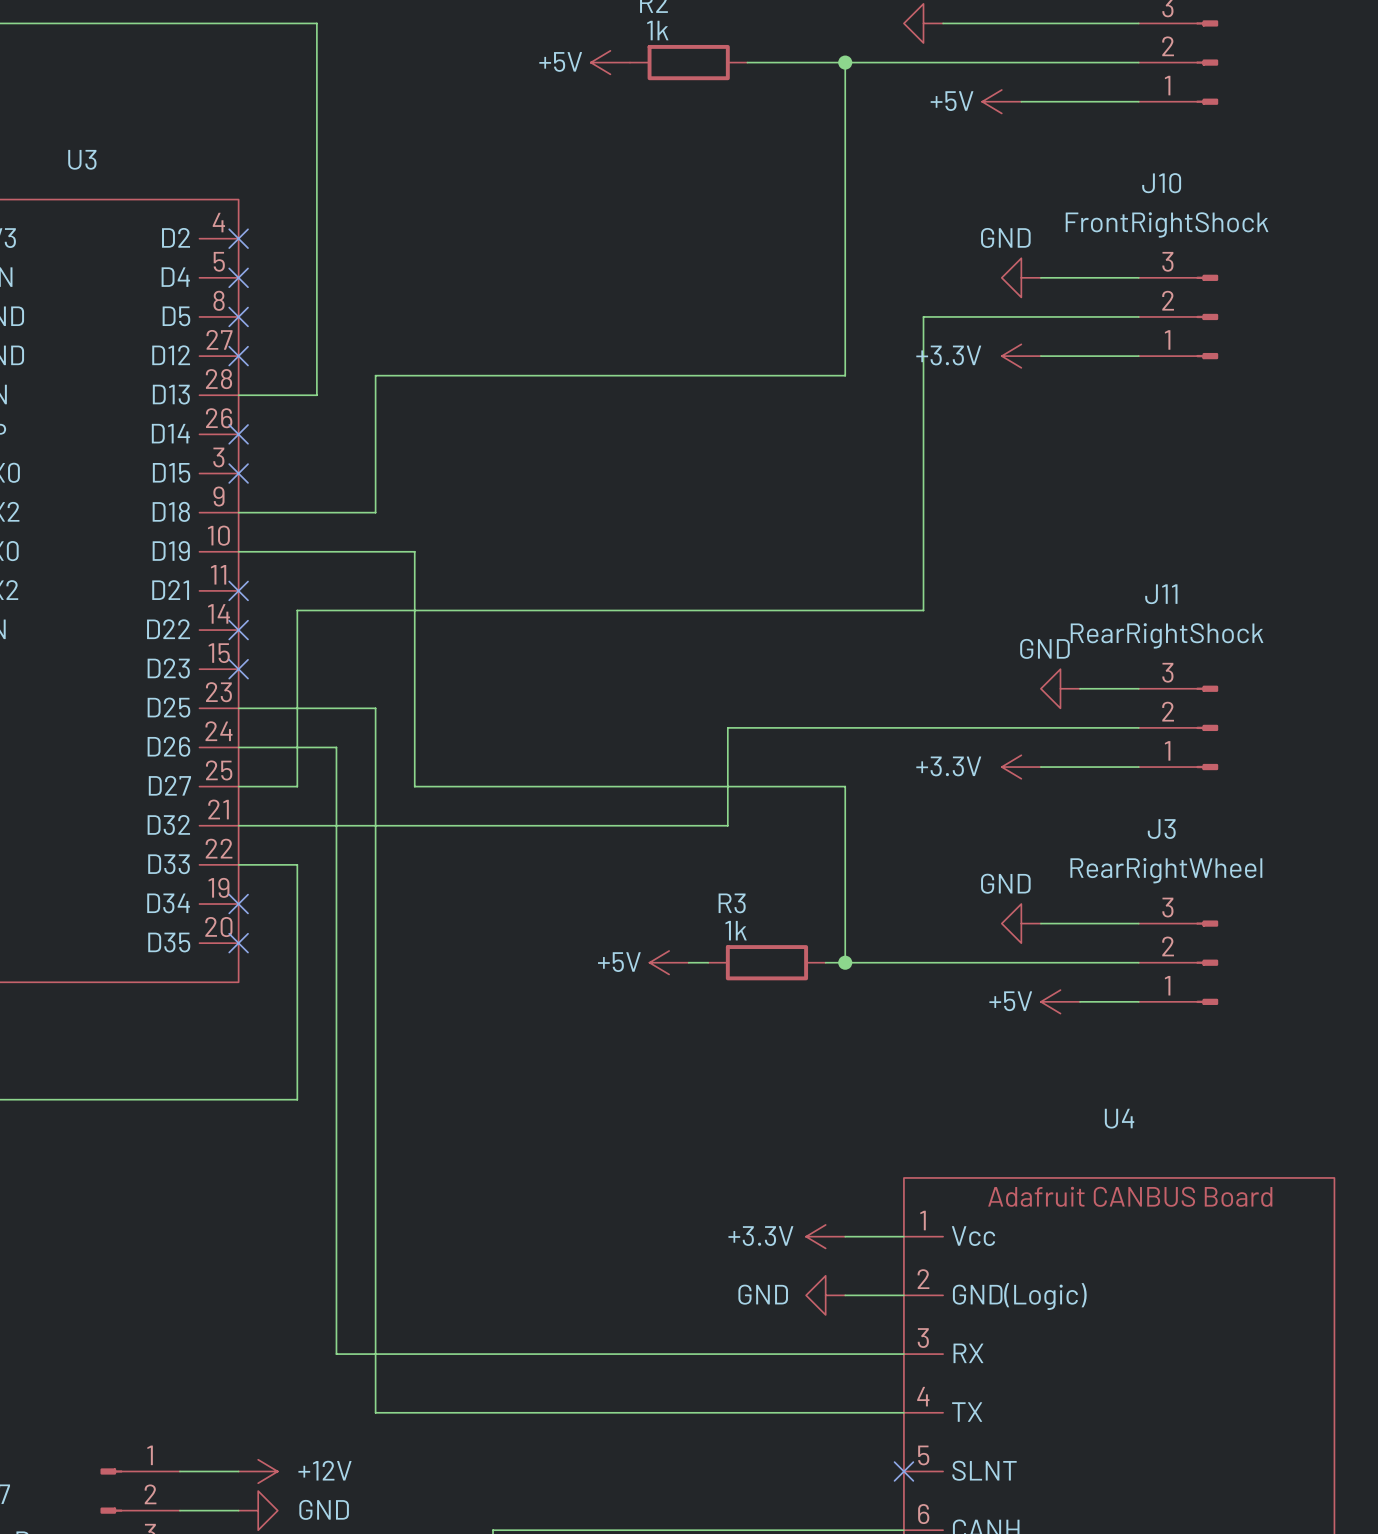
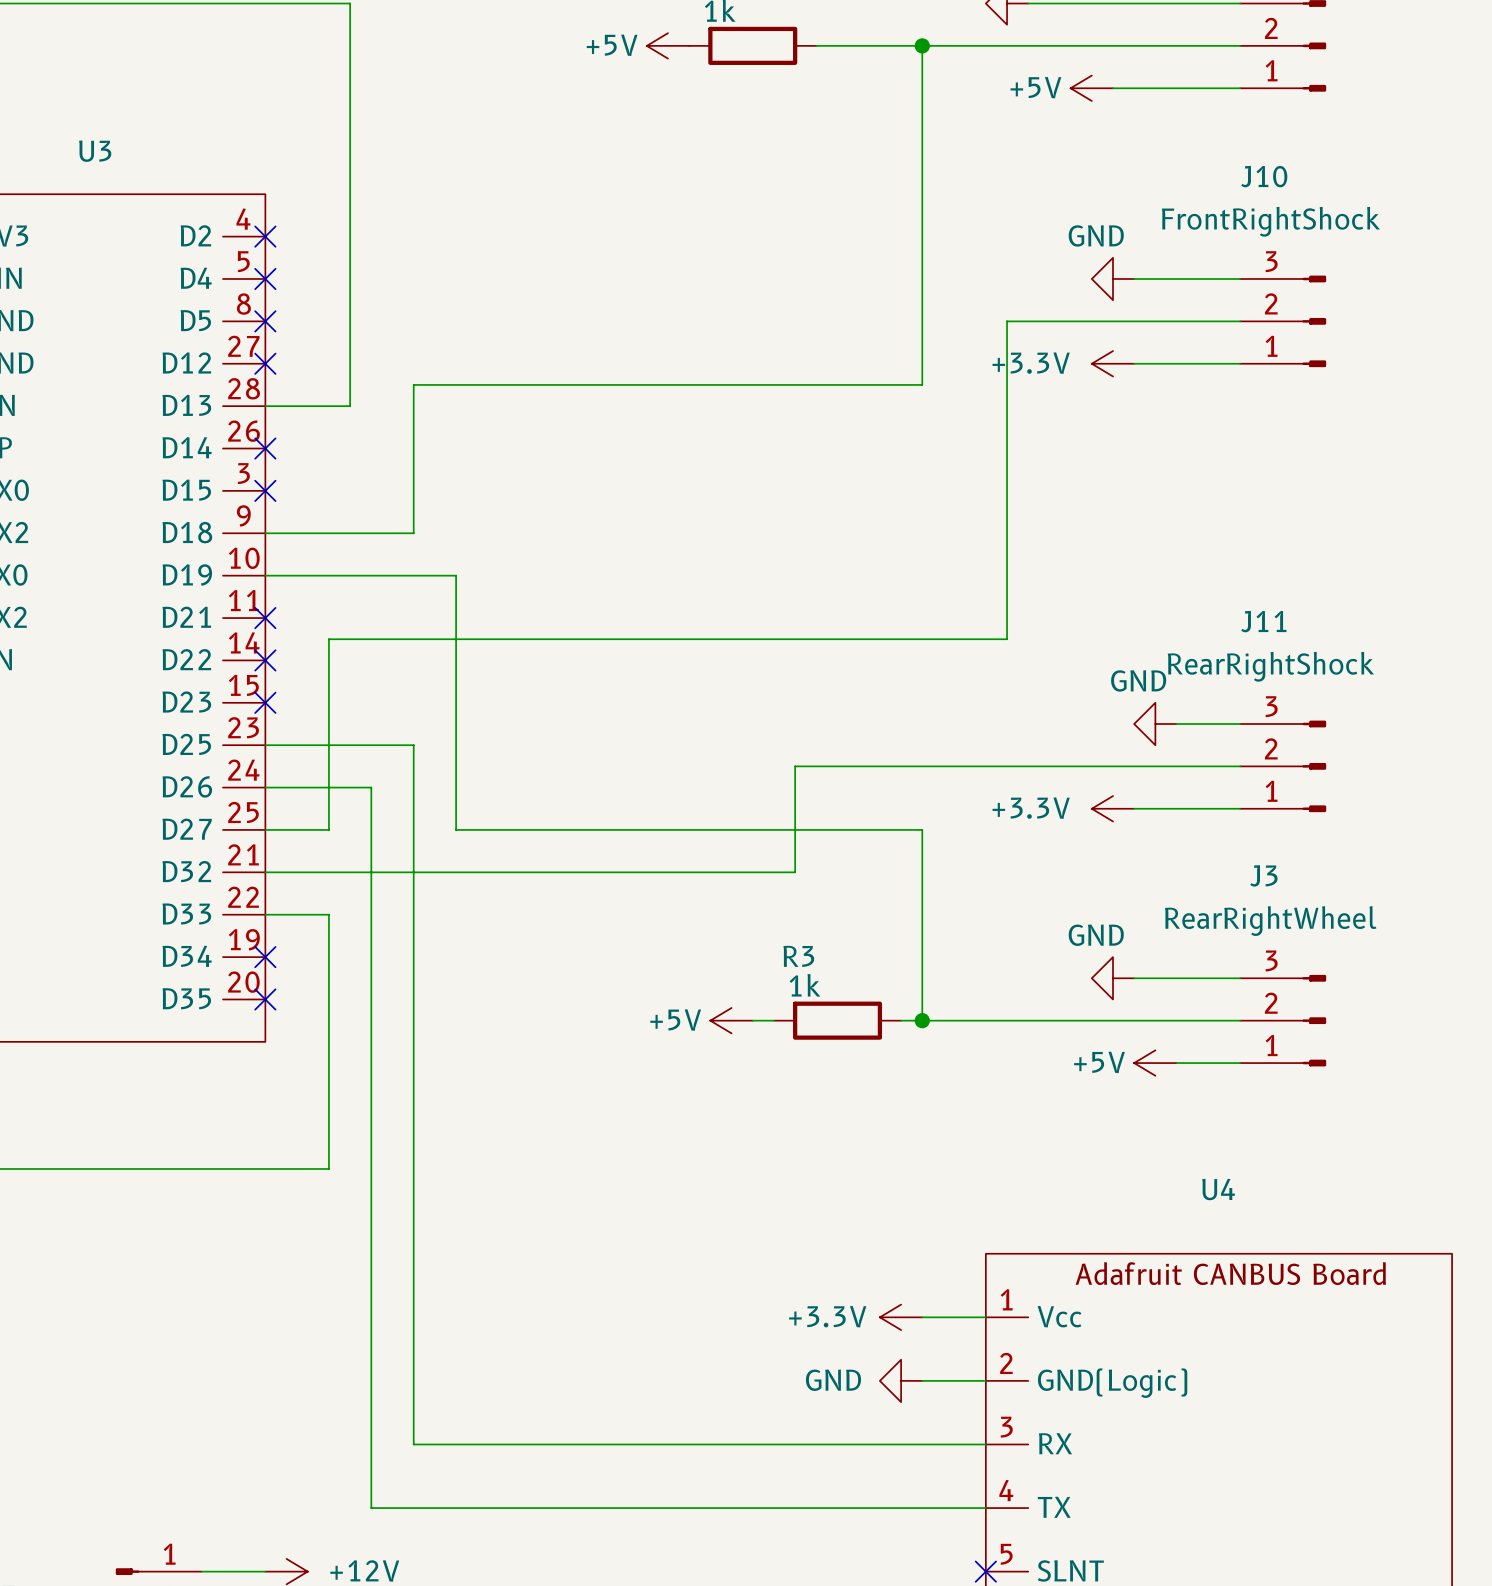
wire: (336, 1354) (375, 1354) (375, 1412) -> (371, 1444) (371, 1508) (413, 1508)

